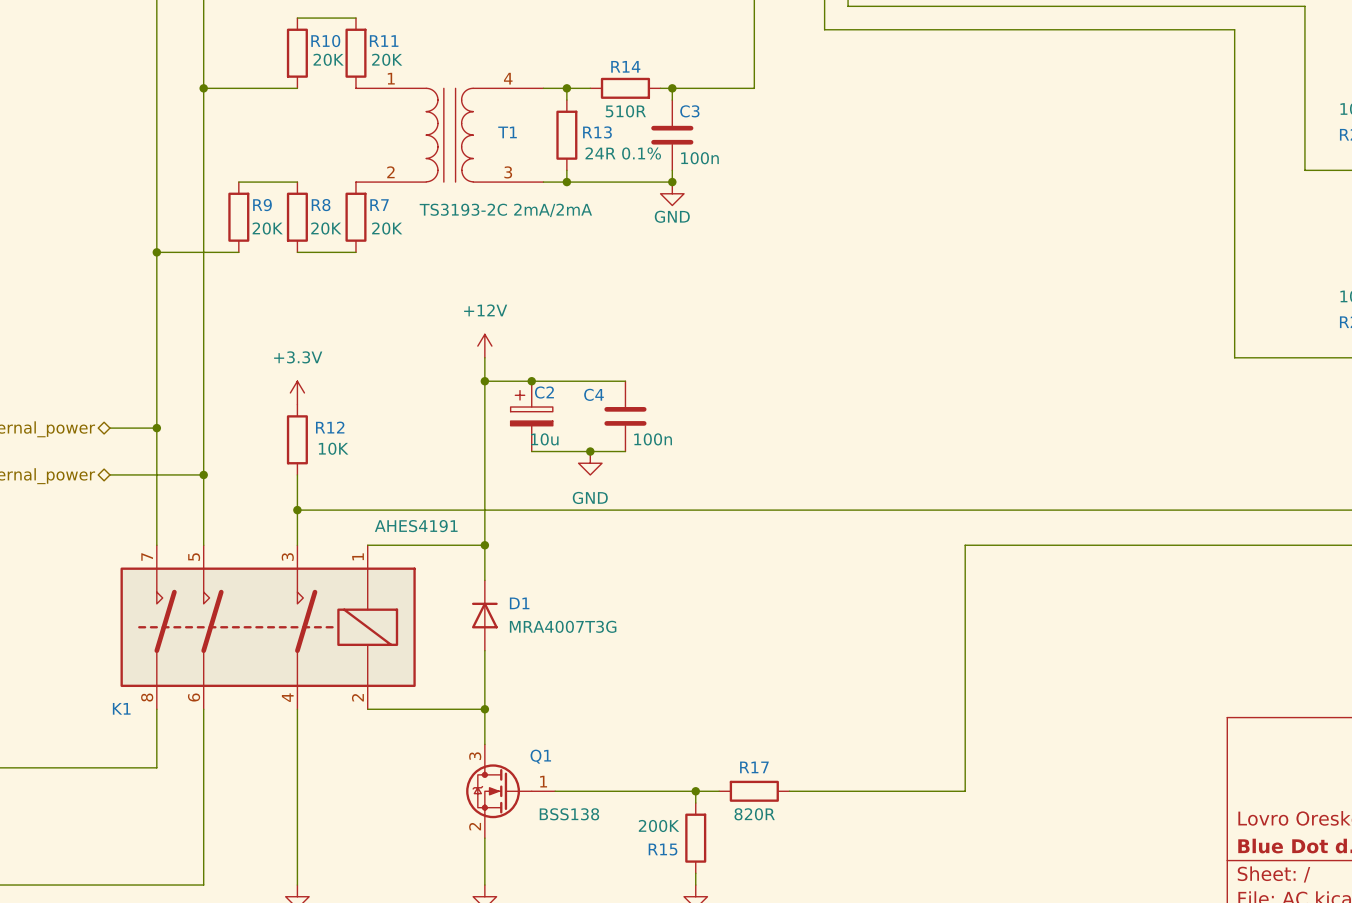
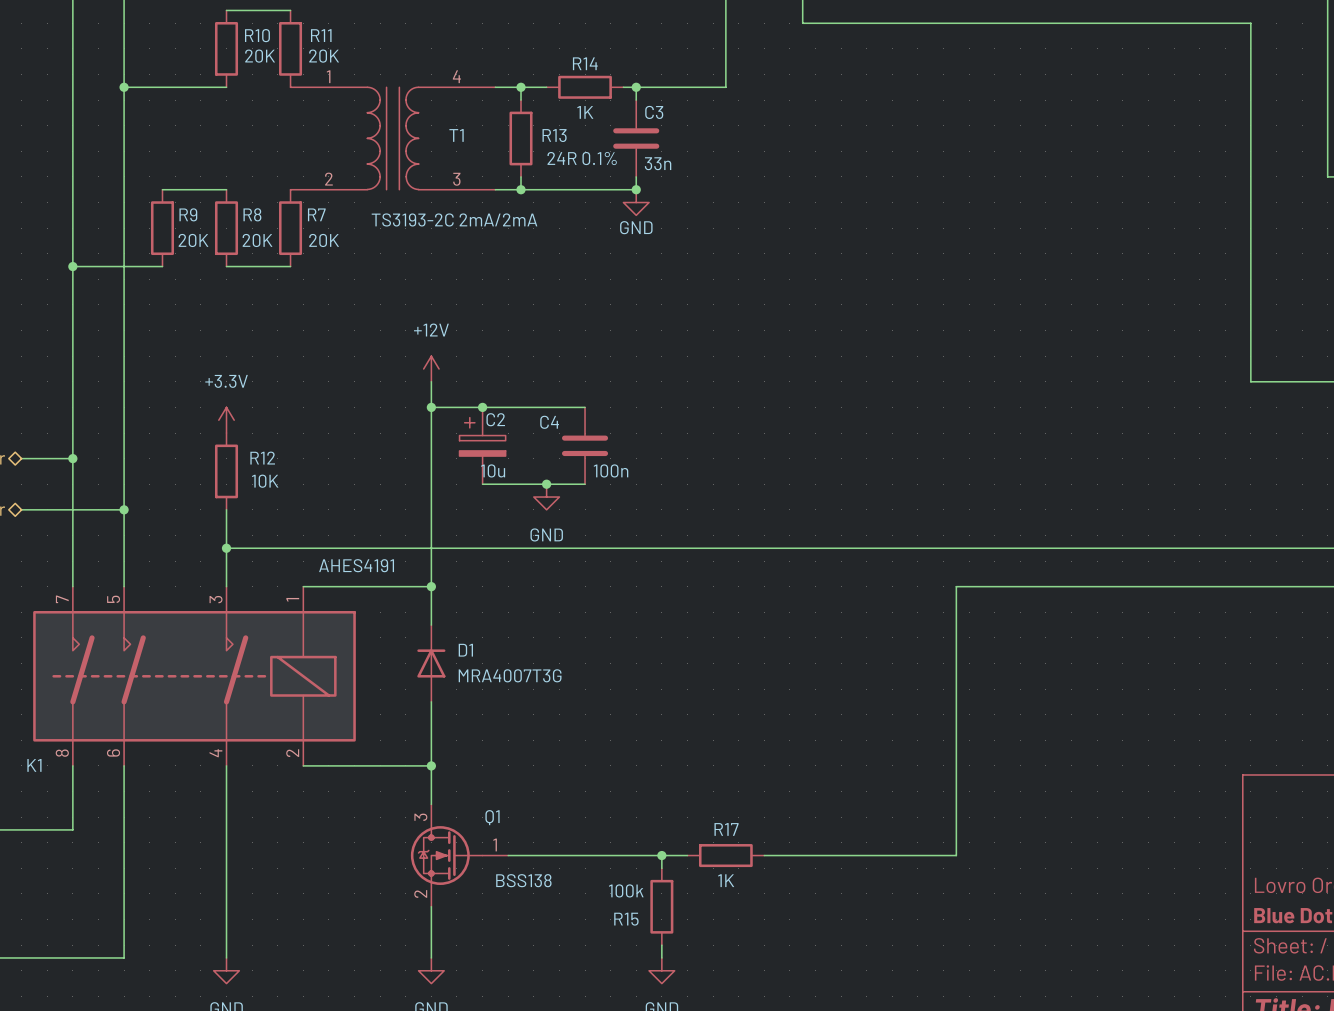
R14 value: 510R (625, 111) -> 1K (585, 112)
C3 value: 100n (699, 158) -> 33n (658, 163)
R17 value: 820R (754, 814) -> 1K (726, 880)
R15 value: 200K (659, 826) -> 100k (626, 890)

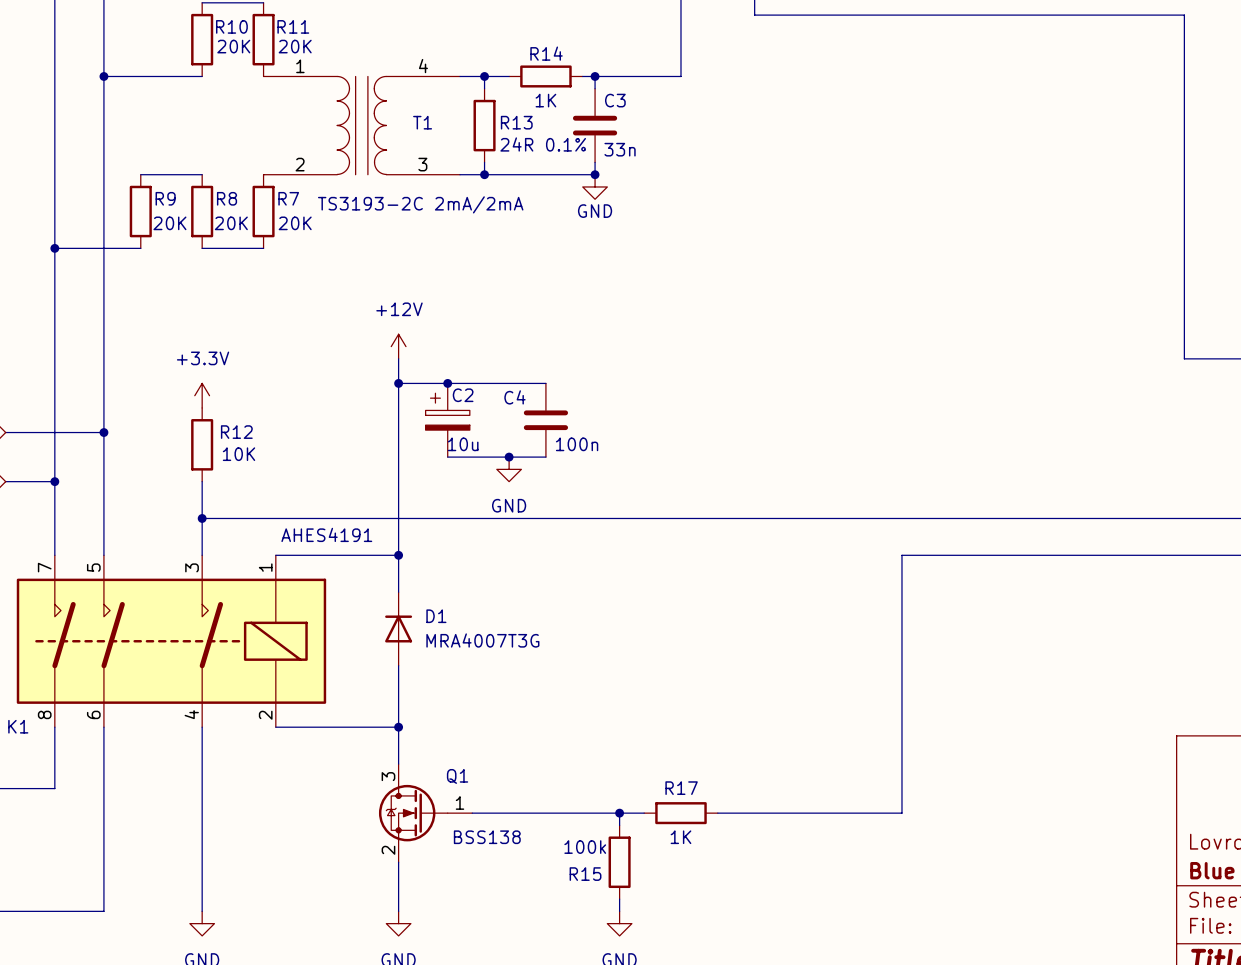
junction: (72, 458) -> none
junction: none -> (103, 432)
wire: (72, 509) (124, 509) -> (54, 432) (103, 432)
junction: none -> (54, 481)
junction: (124, 509) -> none

